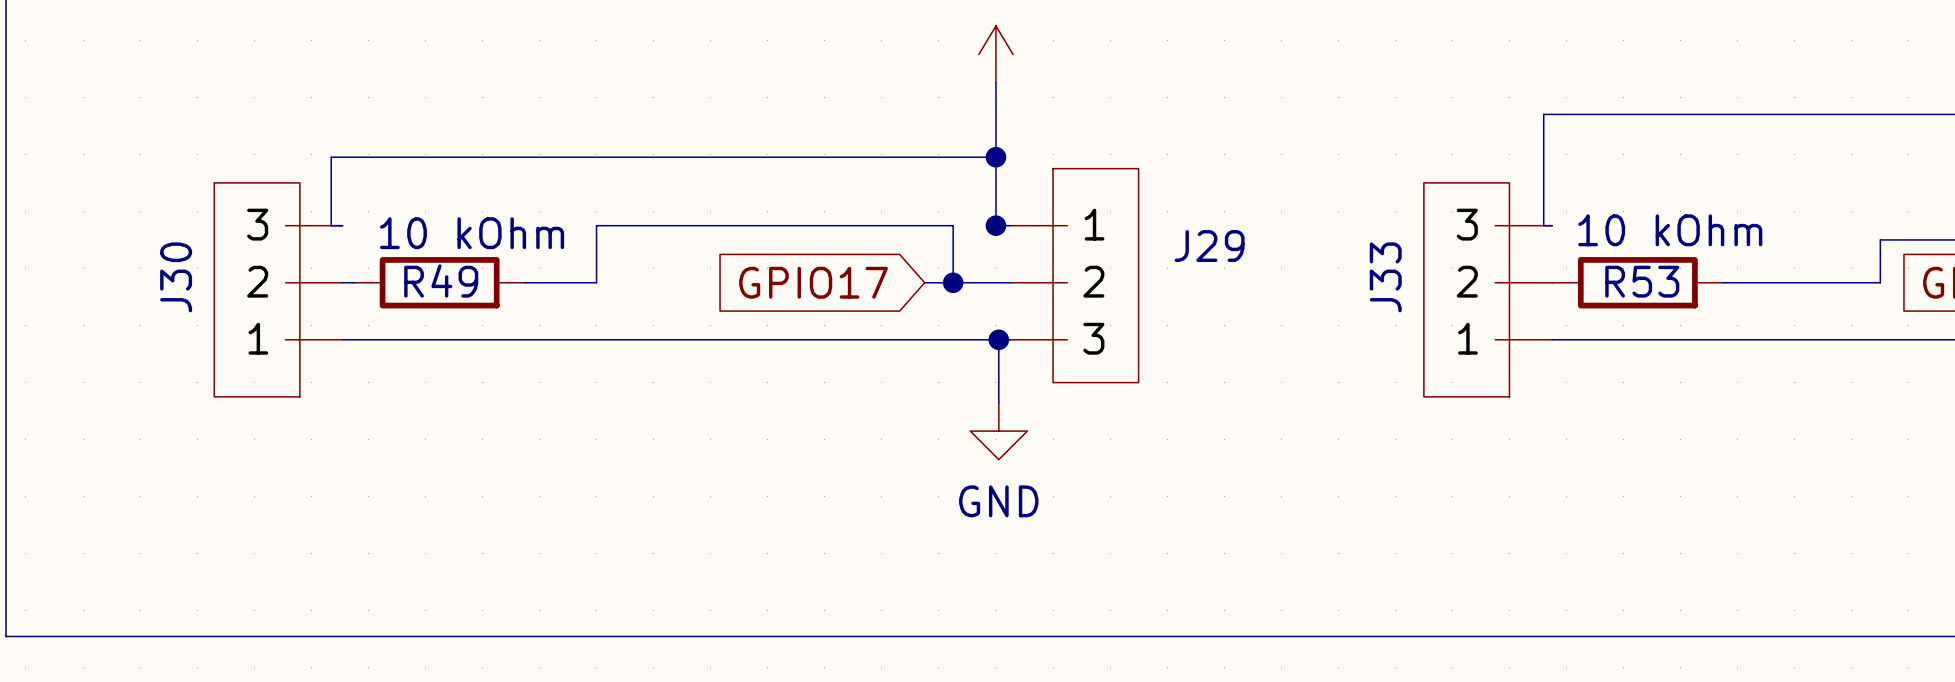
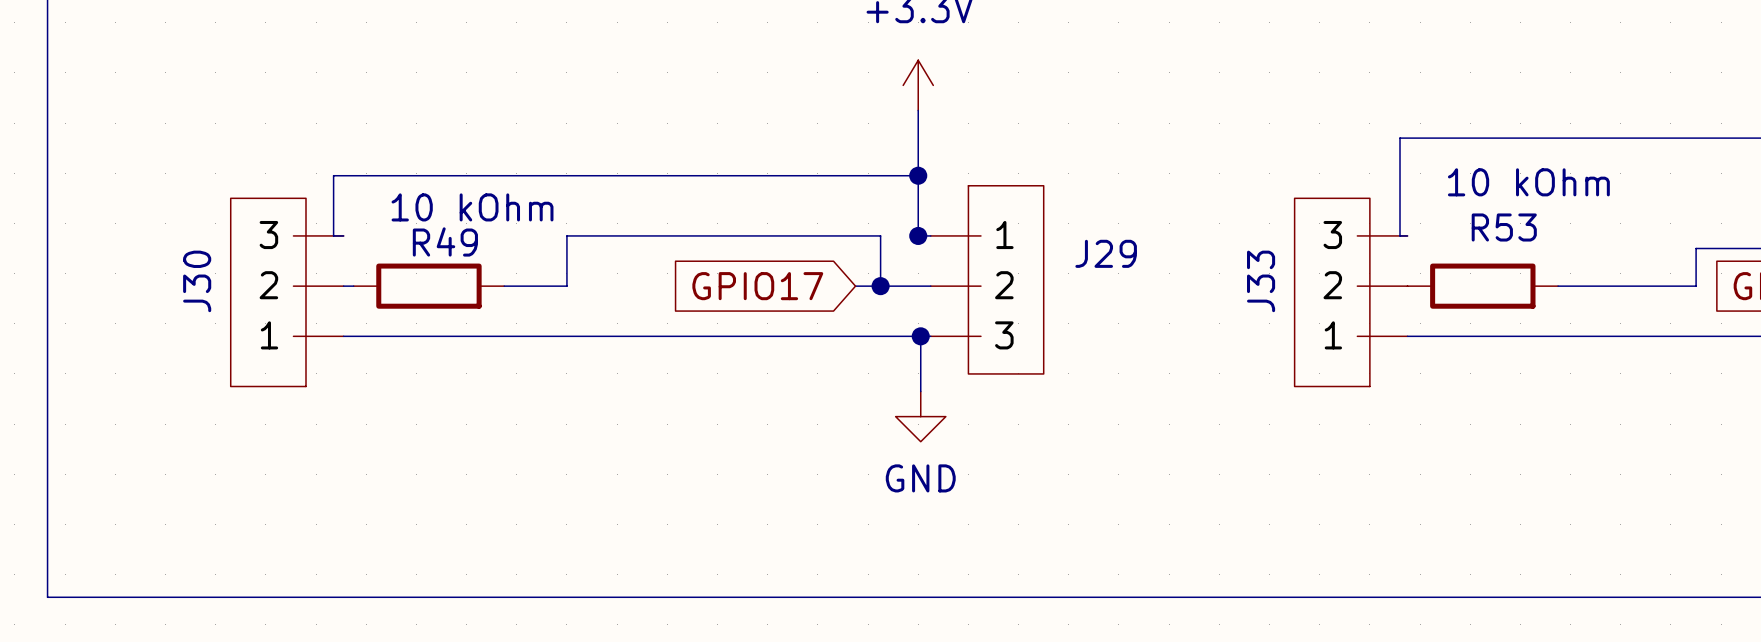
R53 value position: 10 kOhm (1670, 230) -> 10 kOhm (1528, 182)
R49 value position: 10 kOhm (472, 233) -> 10 kOhm (472, 207)
R49 name position: R49 (441, 281) -> R49 (445, 241)
R53 name position: R53 (1642, 281) -> R53 (1504, 227)

